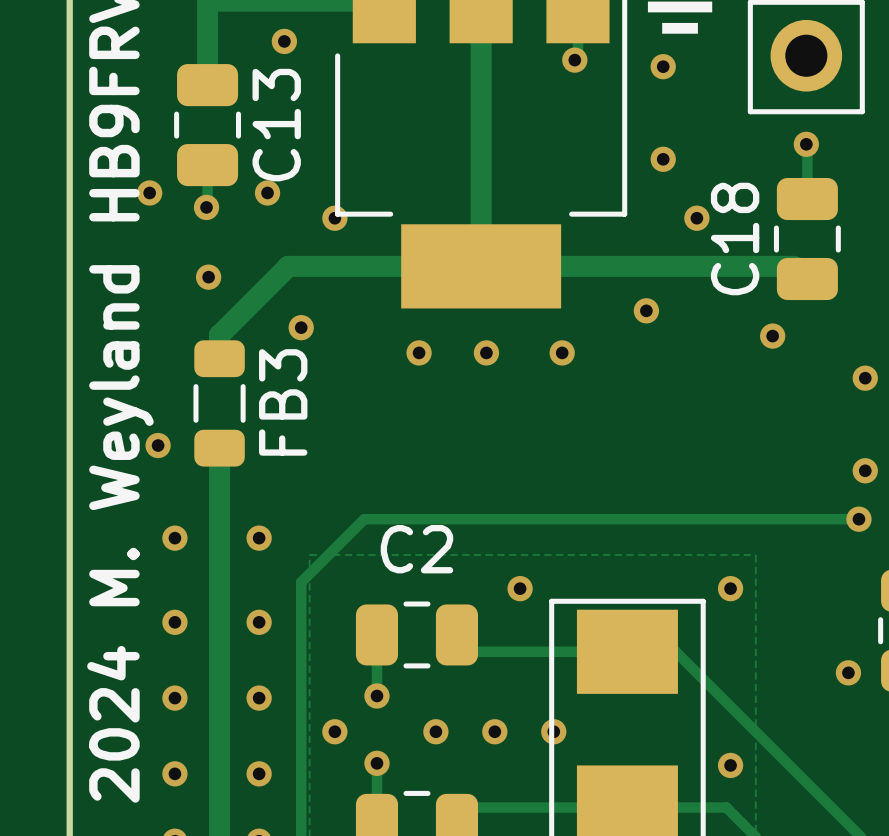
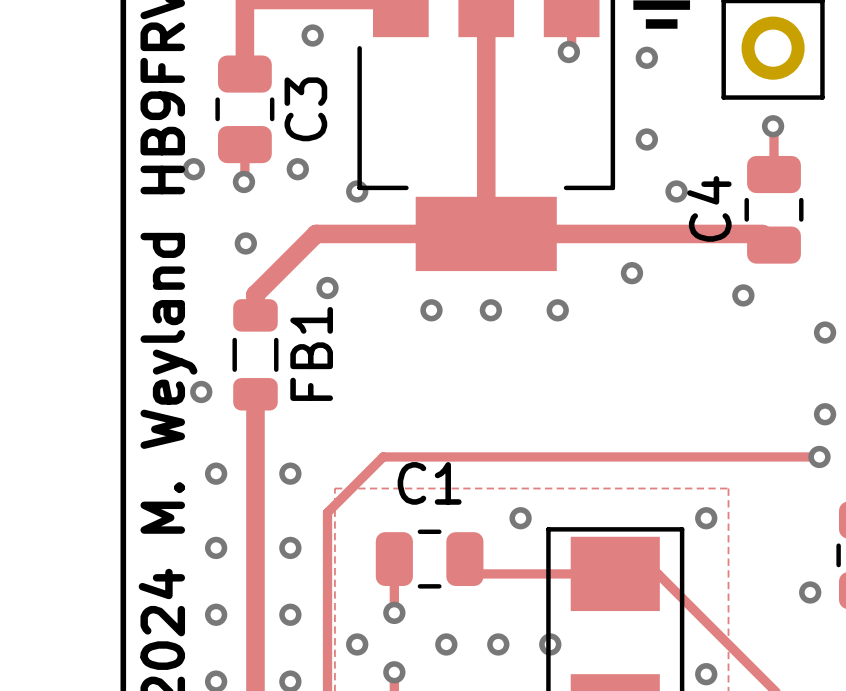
C13 name: C13 (276, 125) -> C3 (305, 109)
C18 name: C18 (735, 239) -> C4 (709, 208)
FB3 name: FB3 (283, 402) -> FB1 (311, 353)
C2 name: C2 (416, 549) -> C1 (429, 483)

